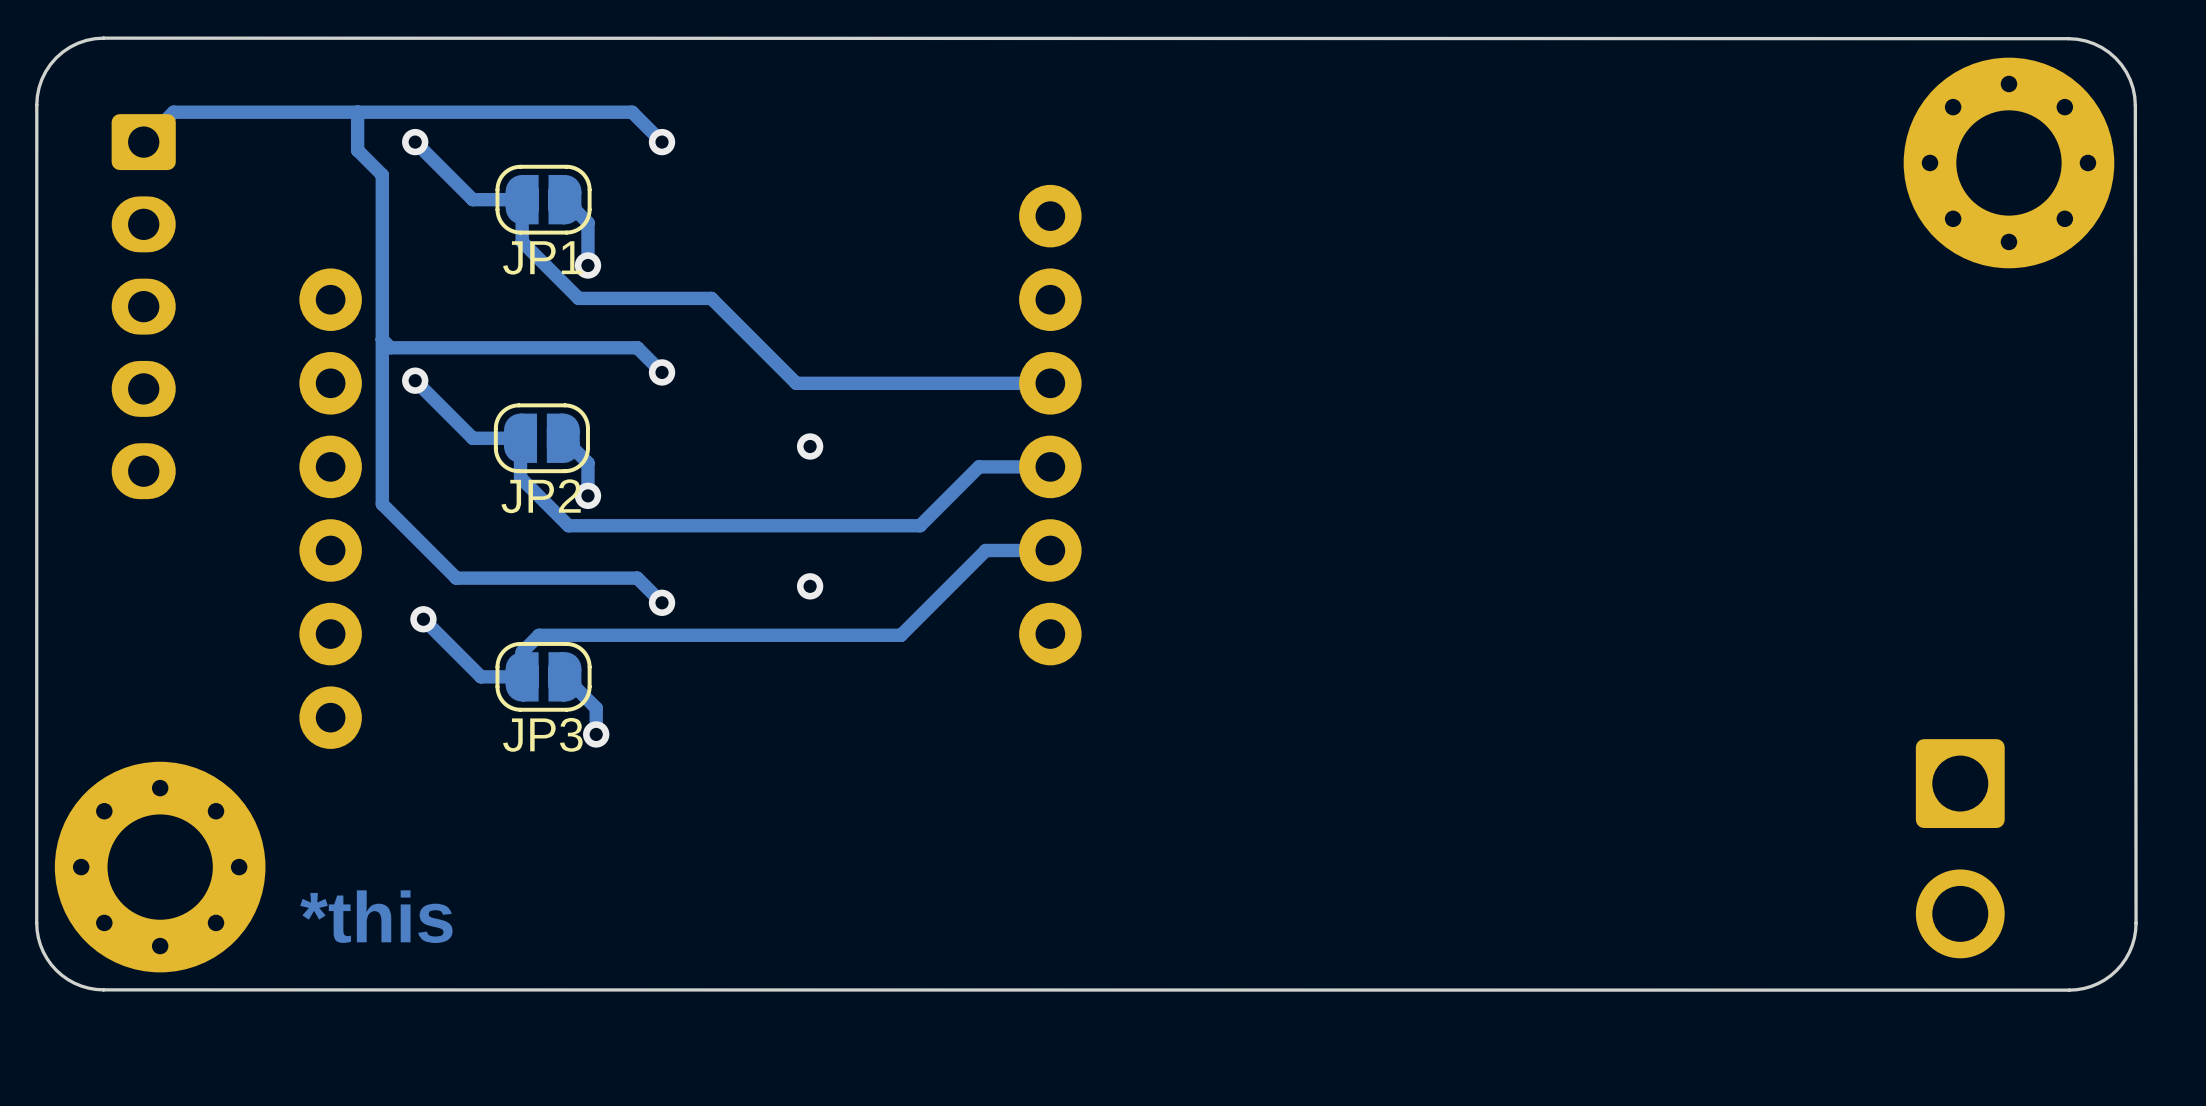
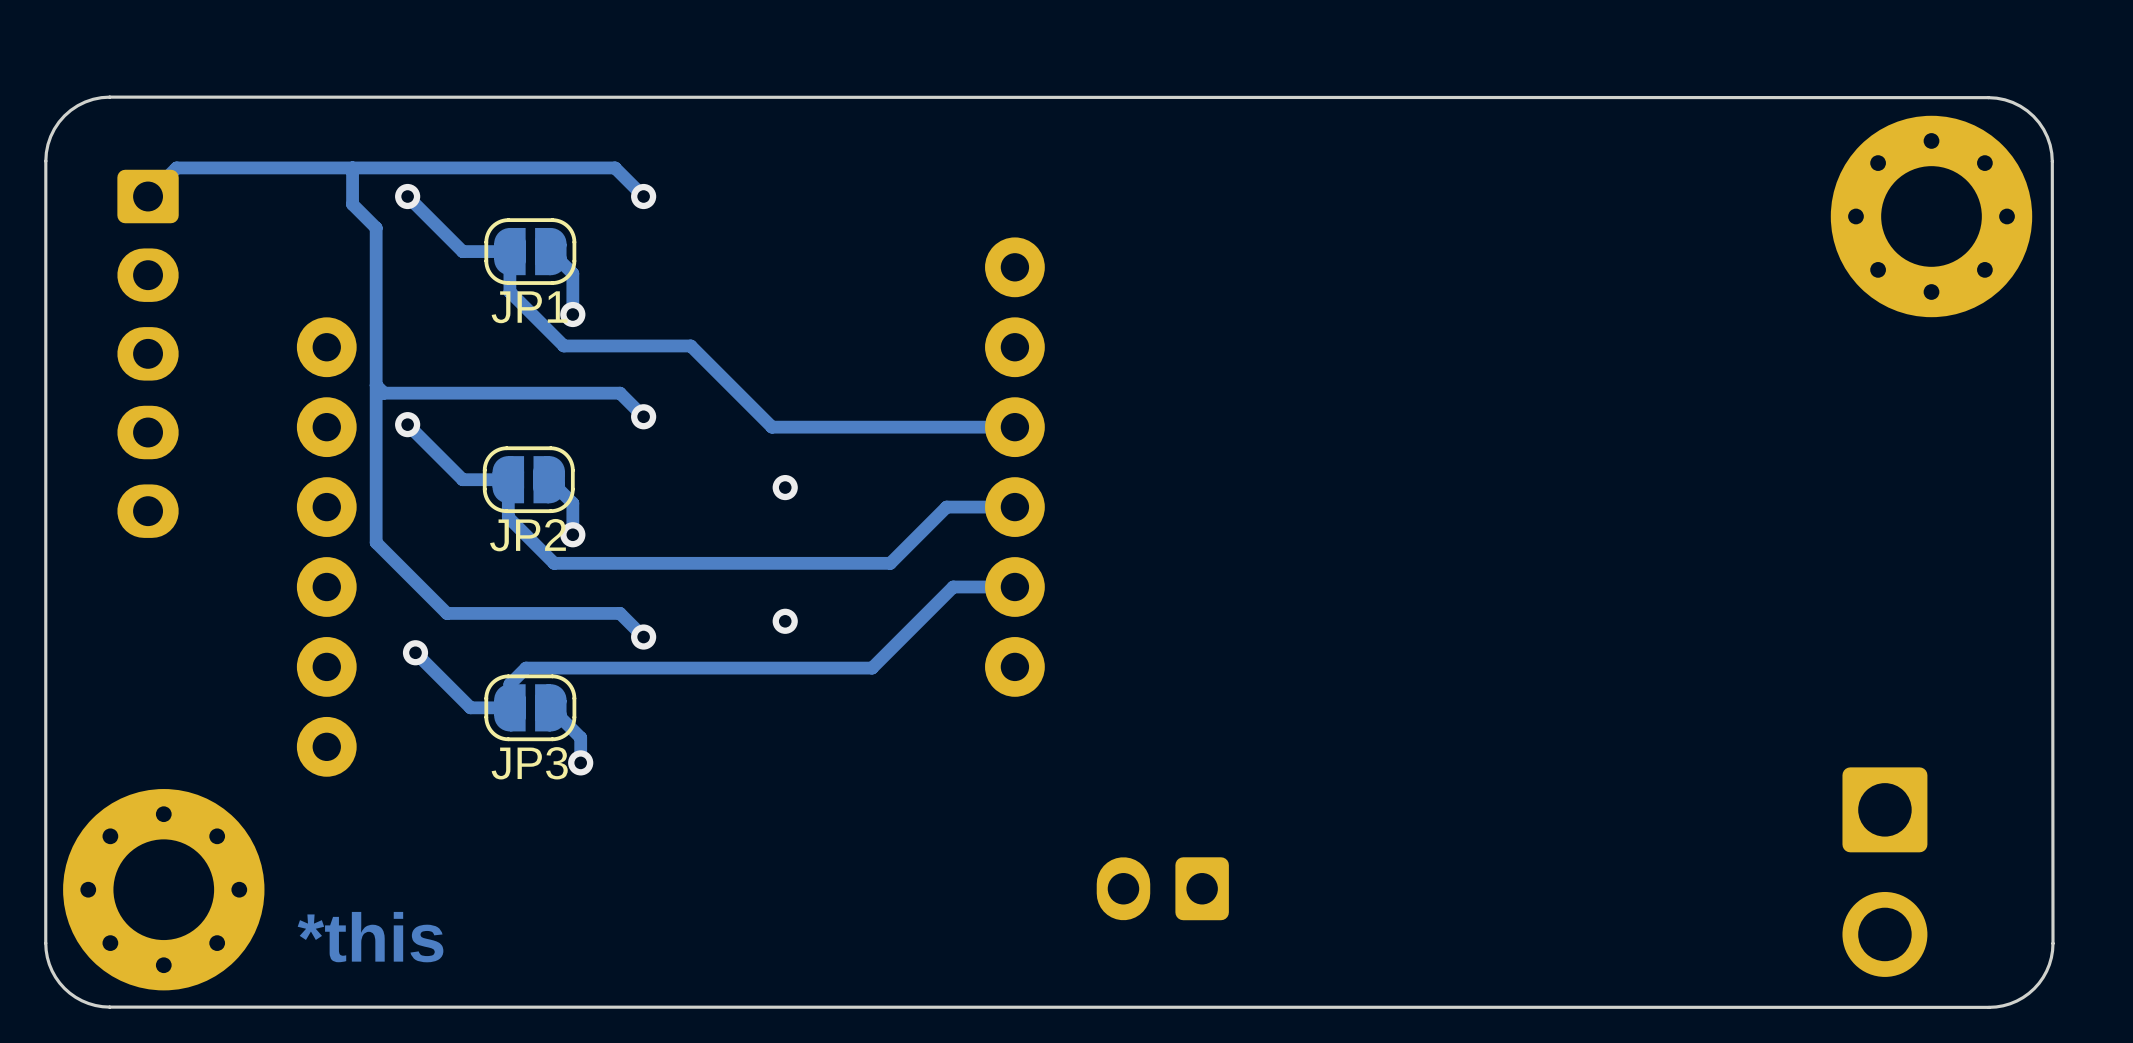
part: none -> (1162, 888)

